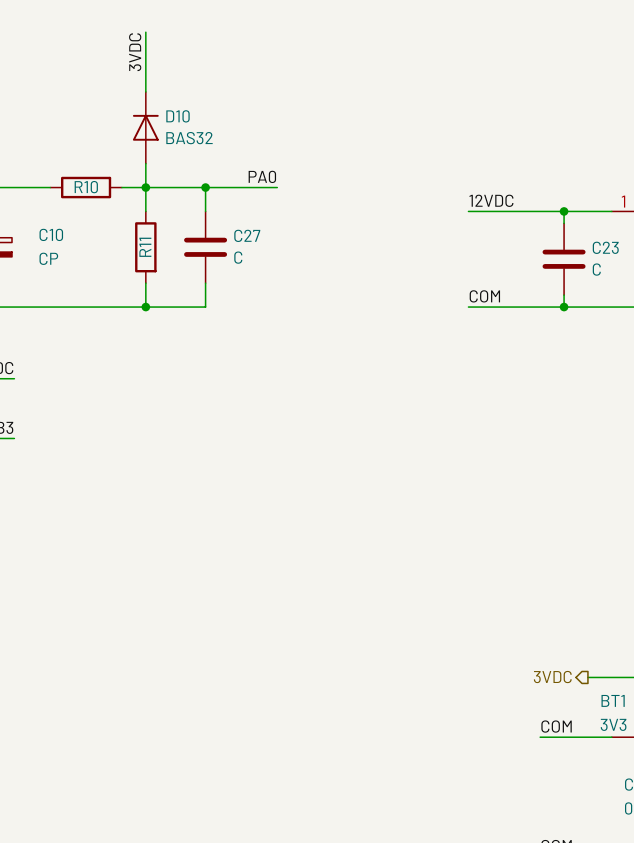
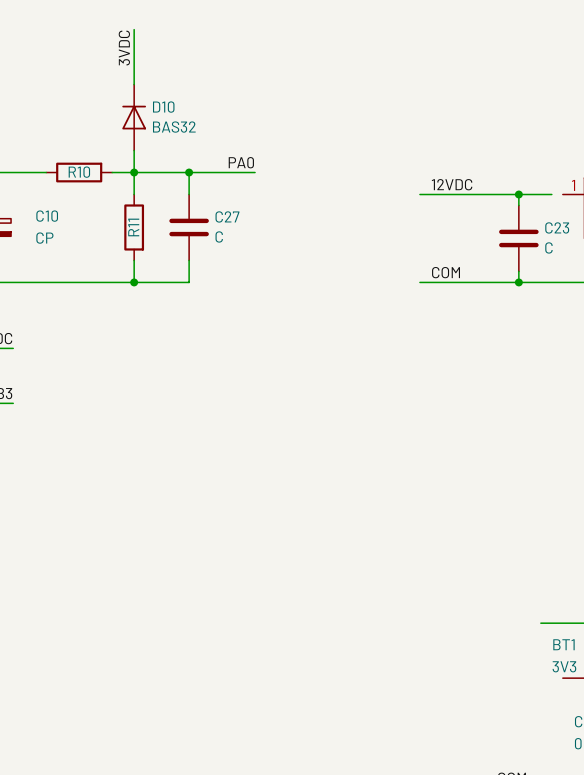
wire: none -> (419, 194) (430, 194)
wire: (599, 211) (611, 211) -> (419, 282) (430, 282)
hierarchical label: 3VDC (552, 677) -> none
label: COM (556, 726) -> none
wire: (540, 737) (611, 737) -> none

